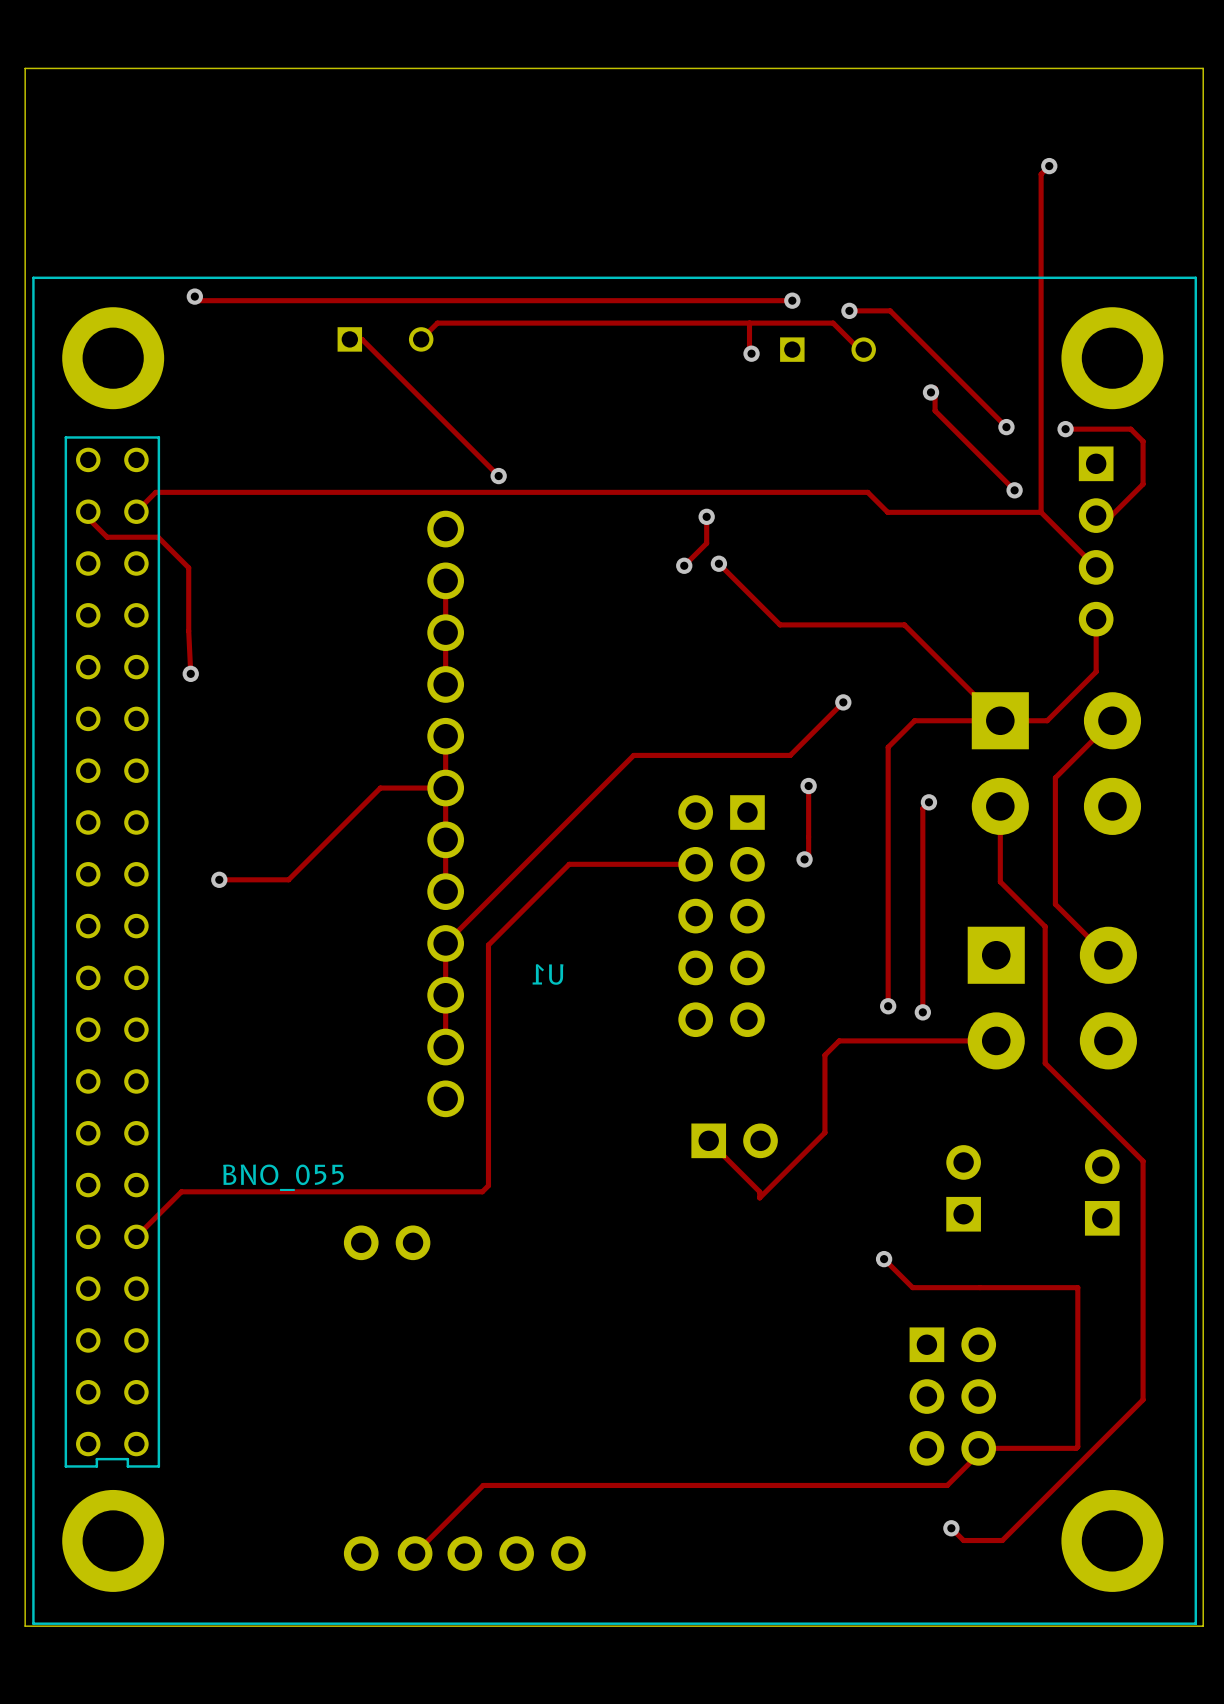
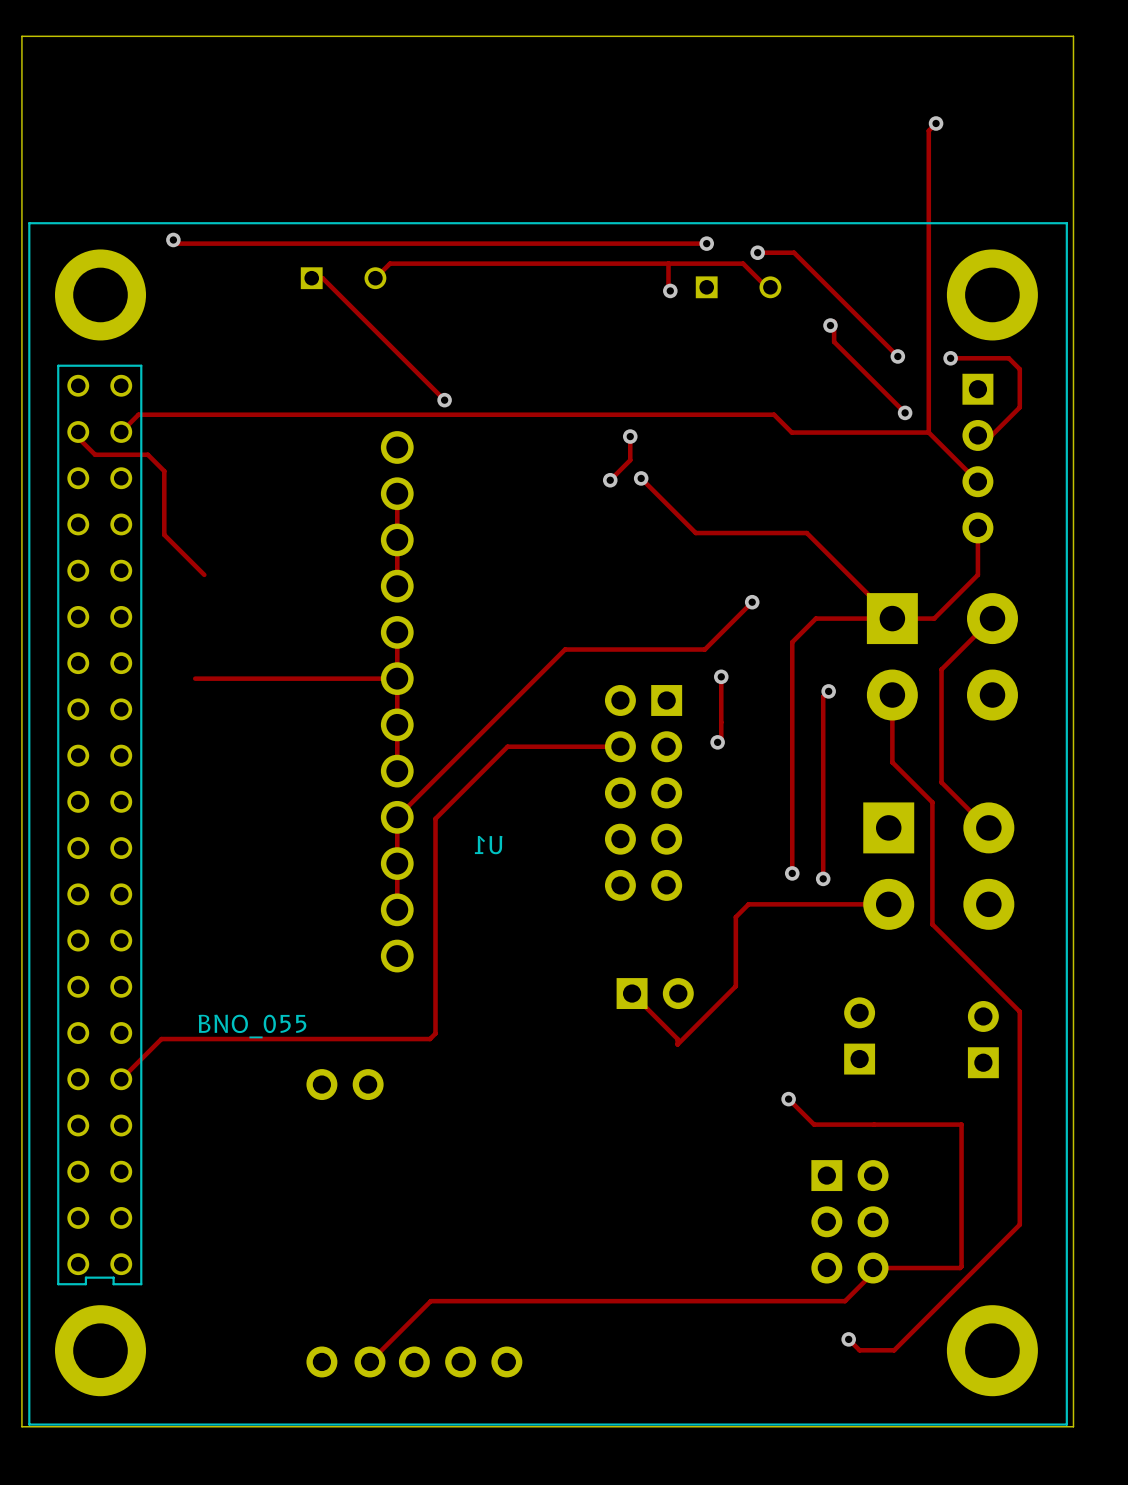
track: (158, 537) (188, 567) (190, 673) -> (140, 454) (147, 454) (164, 471) (164, 534) (204, 574)
via: (190, 673) -> none
track: (380, 788) (288, 879) (219, 879) -> (339, 678) (195, 678)
via: (219, 879) -> none

